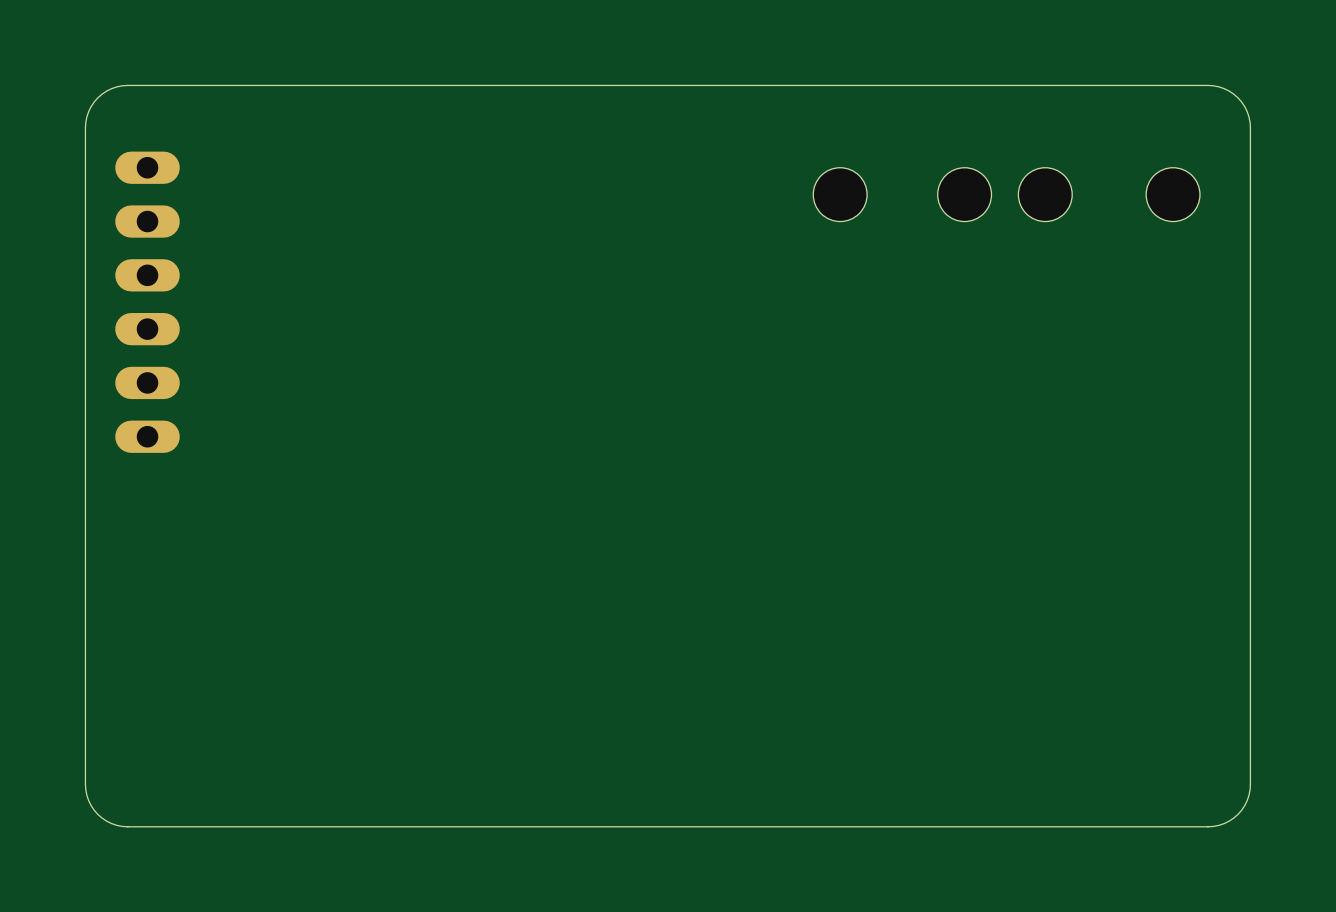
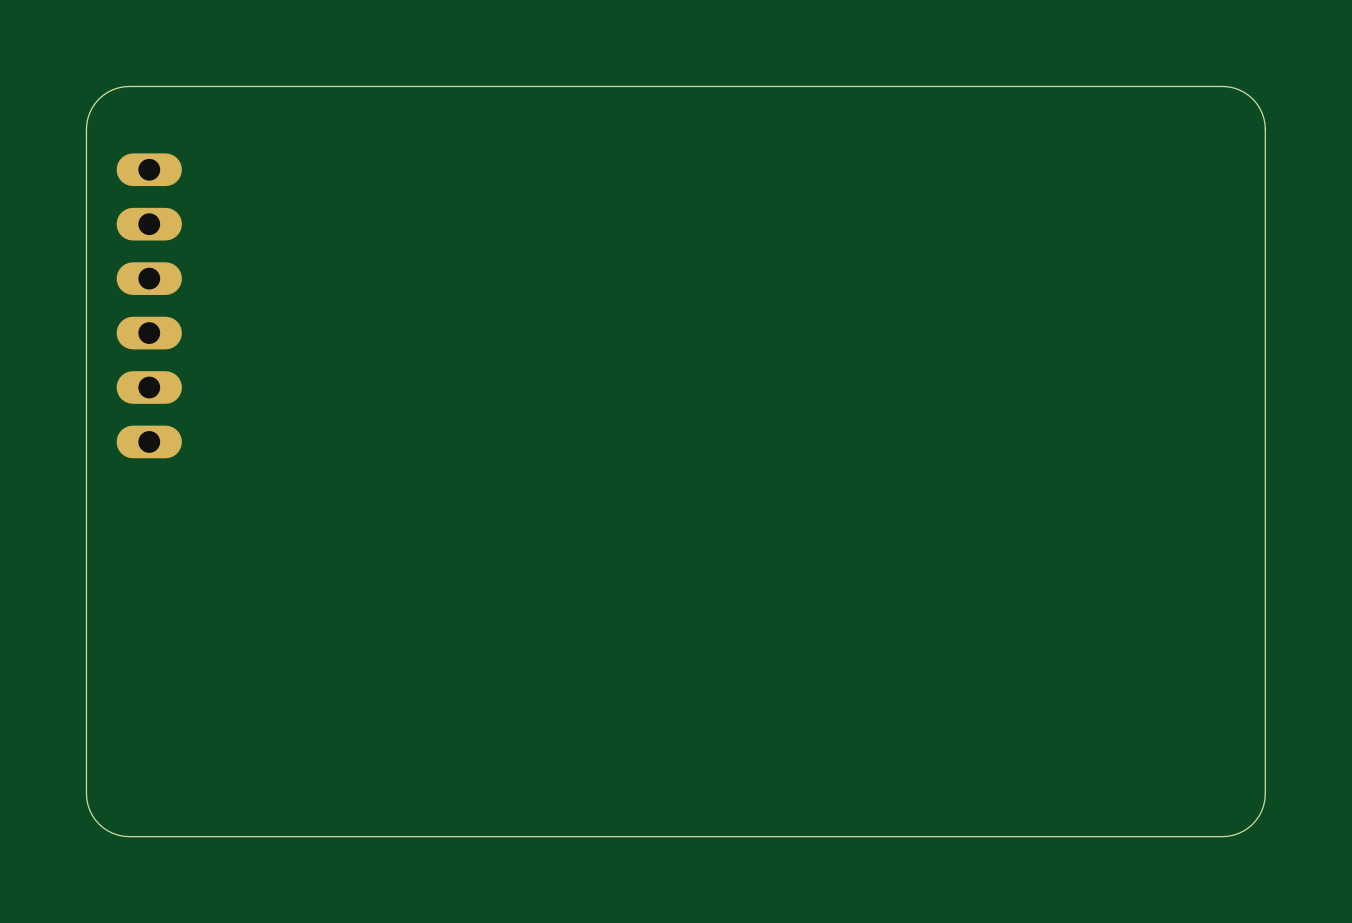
hole: (840, 194) -> none
hole: (964, 194) -> none
hole: (1045, 194) -> none
hole: (1173, 194) -> none

